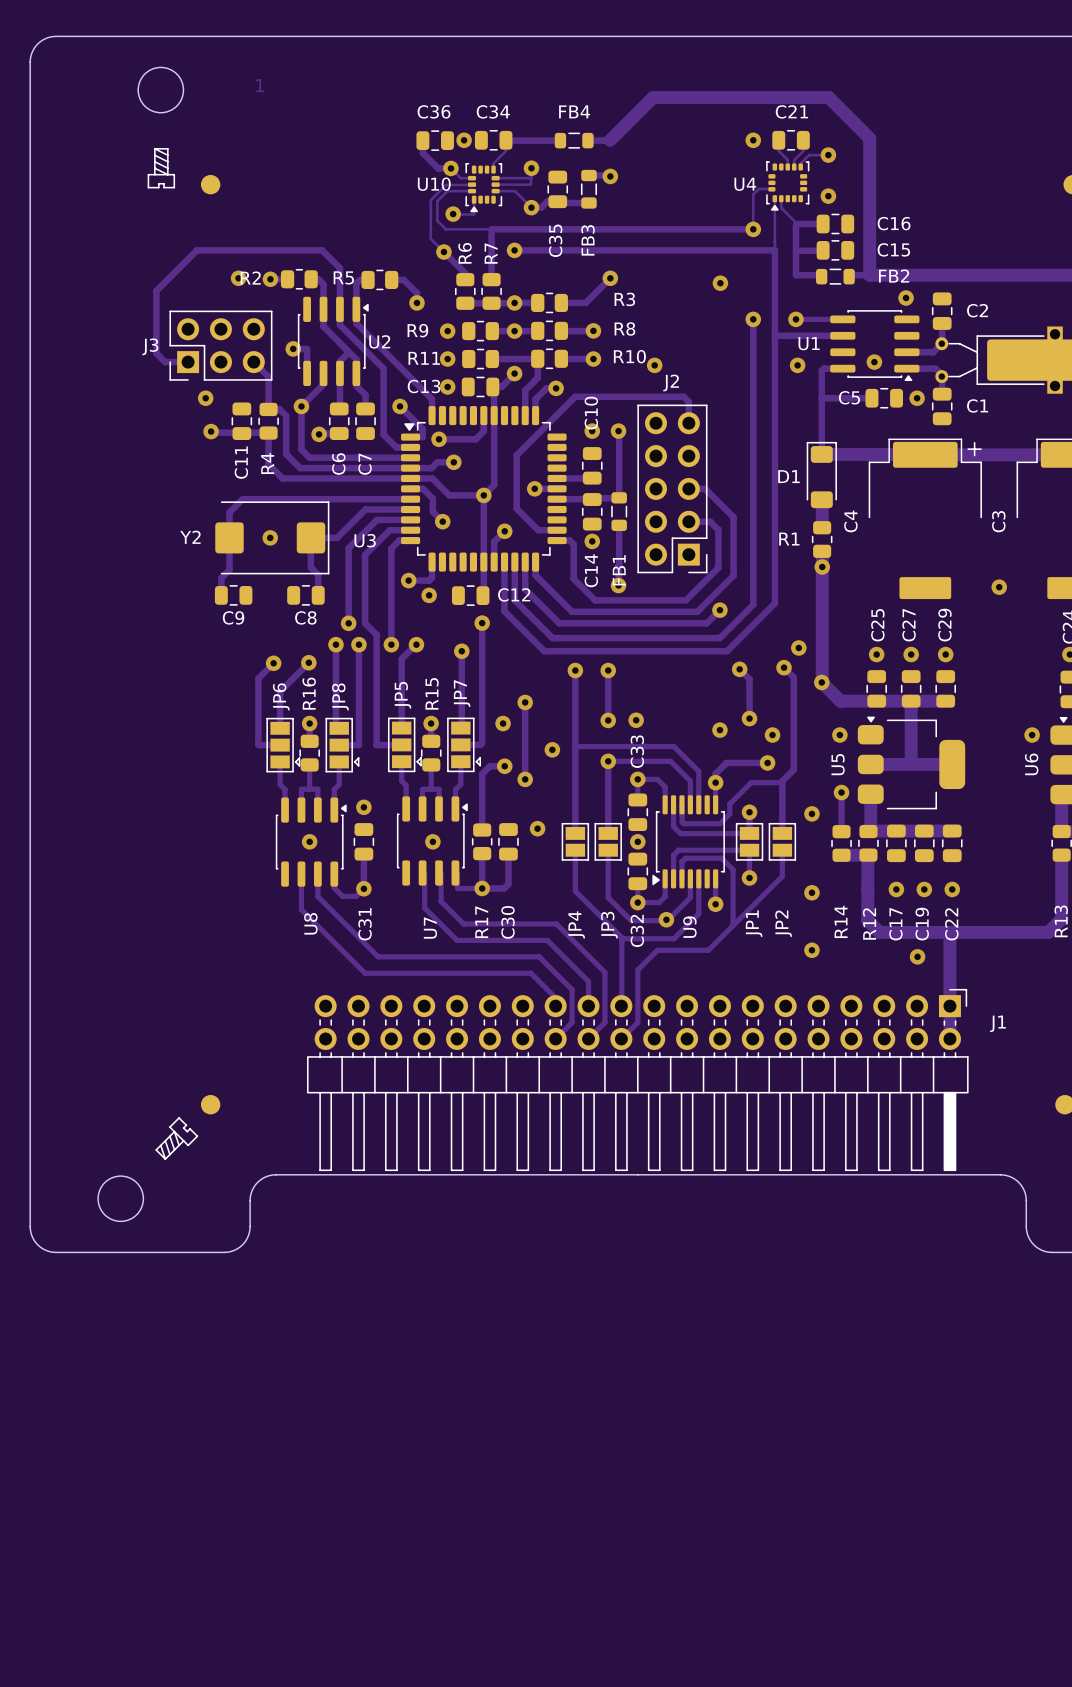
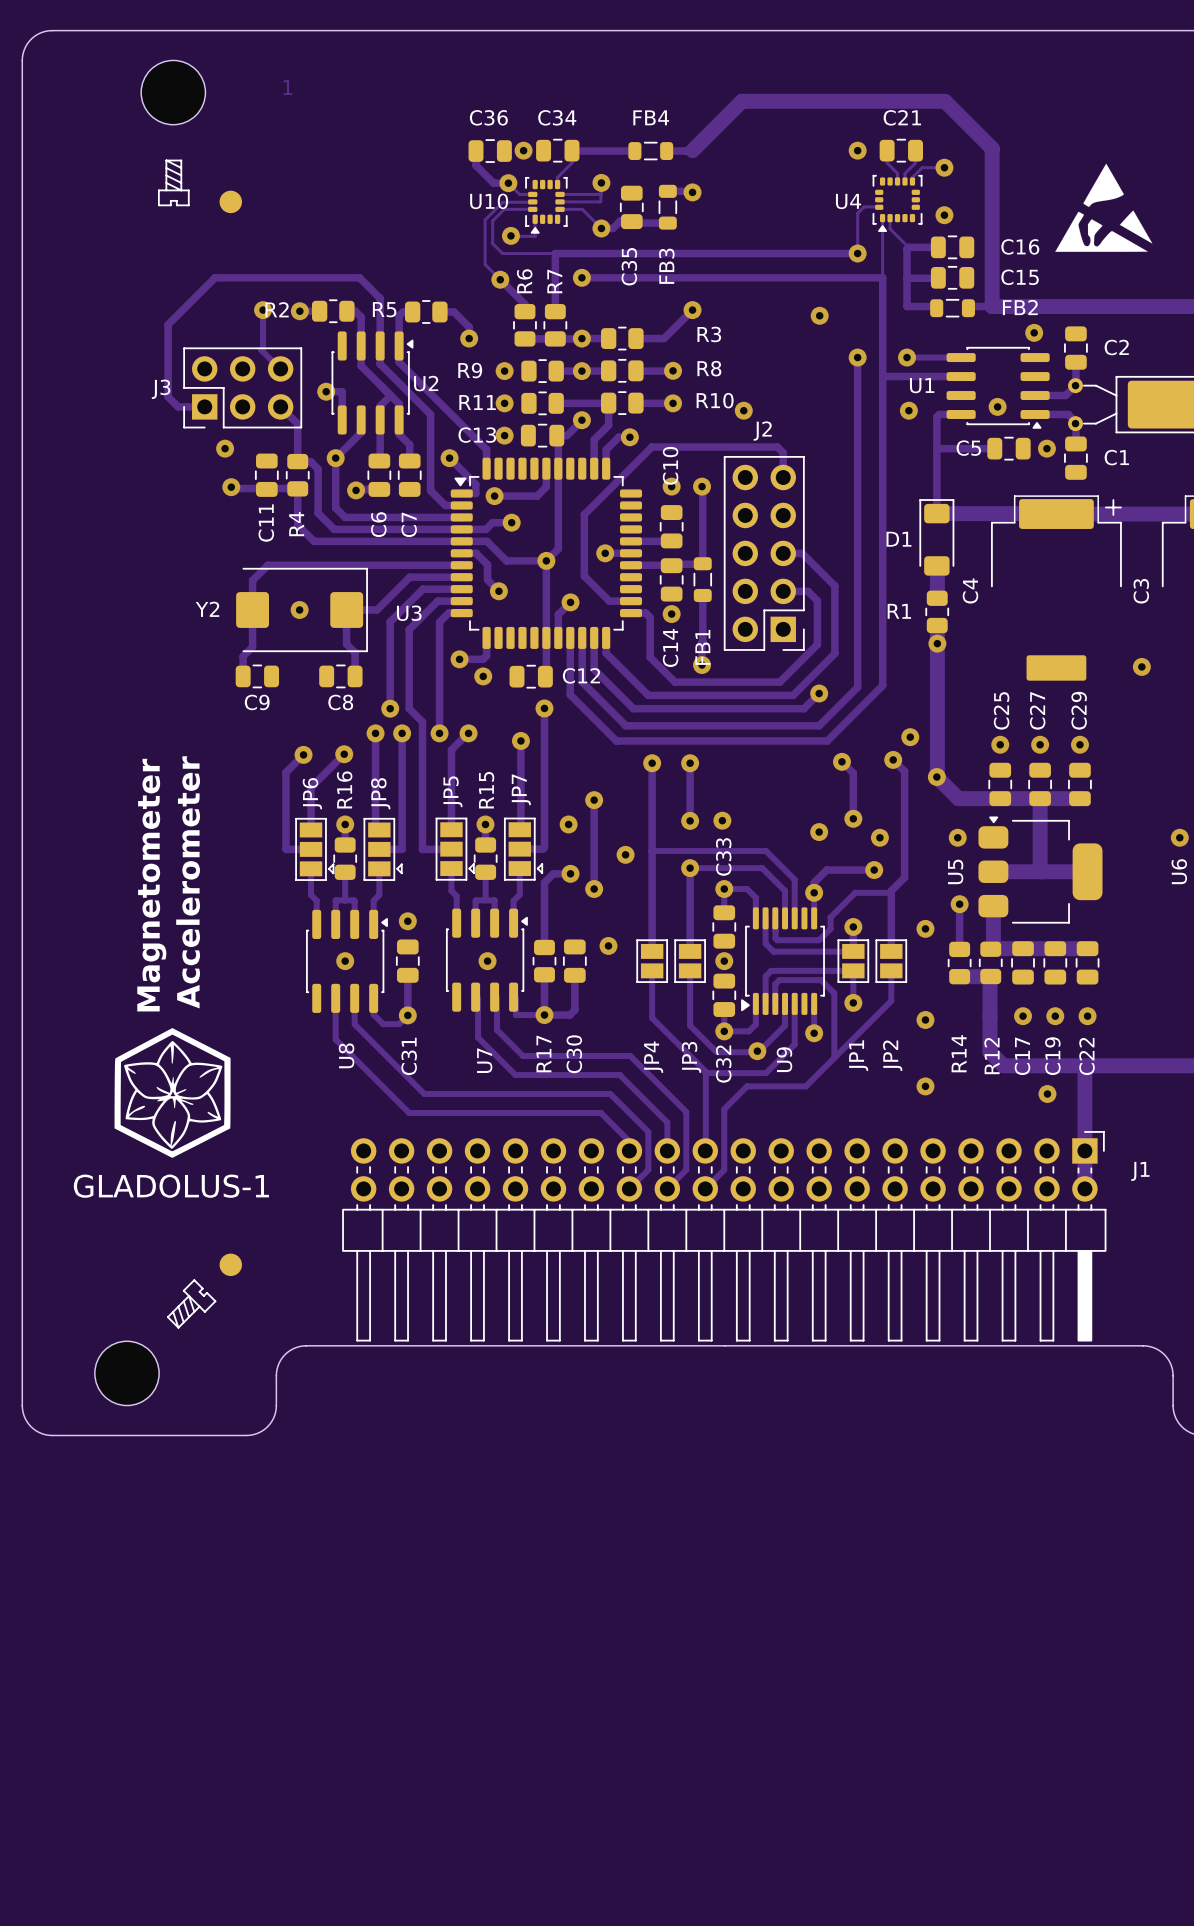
round board edge: [137, 66, 185, 114] -> none
part: none -> (173, 92)
drawing: none -> [1055, 163, 1153, 252]
track: none -> (263, 310) (263, 348) (261, 349) (280, 368)
text: none -> Аccelerometer (188, 882)
text: none -> Magnetometer (151, 885)
GLADOLUS-1: none -> (172, 1092)
round board edge: [97, 1175, 145, 1223] -> none
part: none -> (126, 1373)

